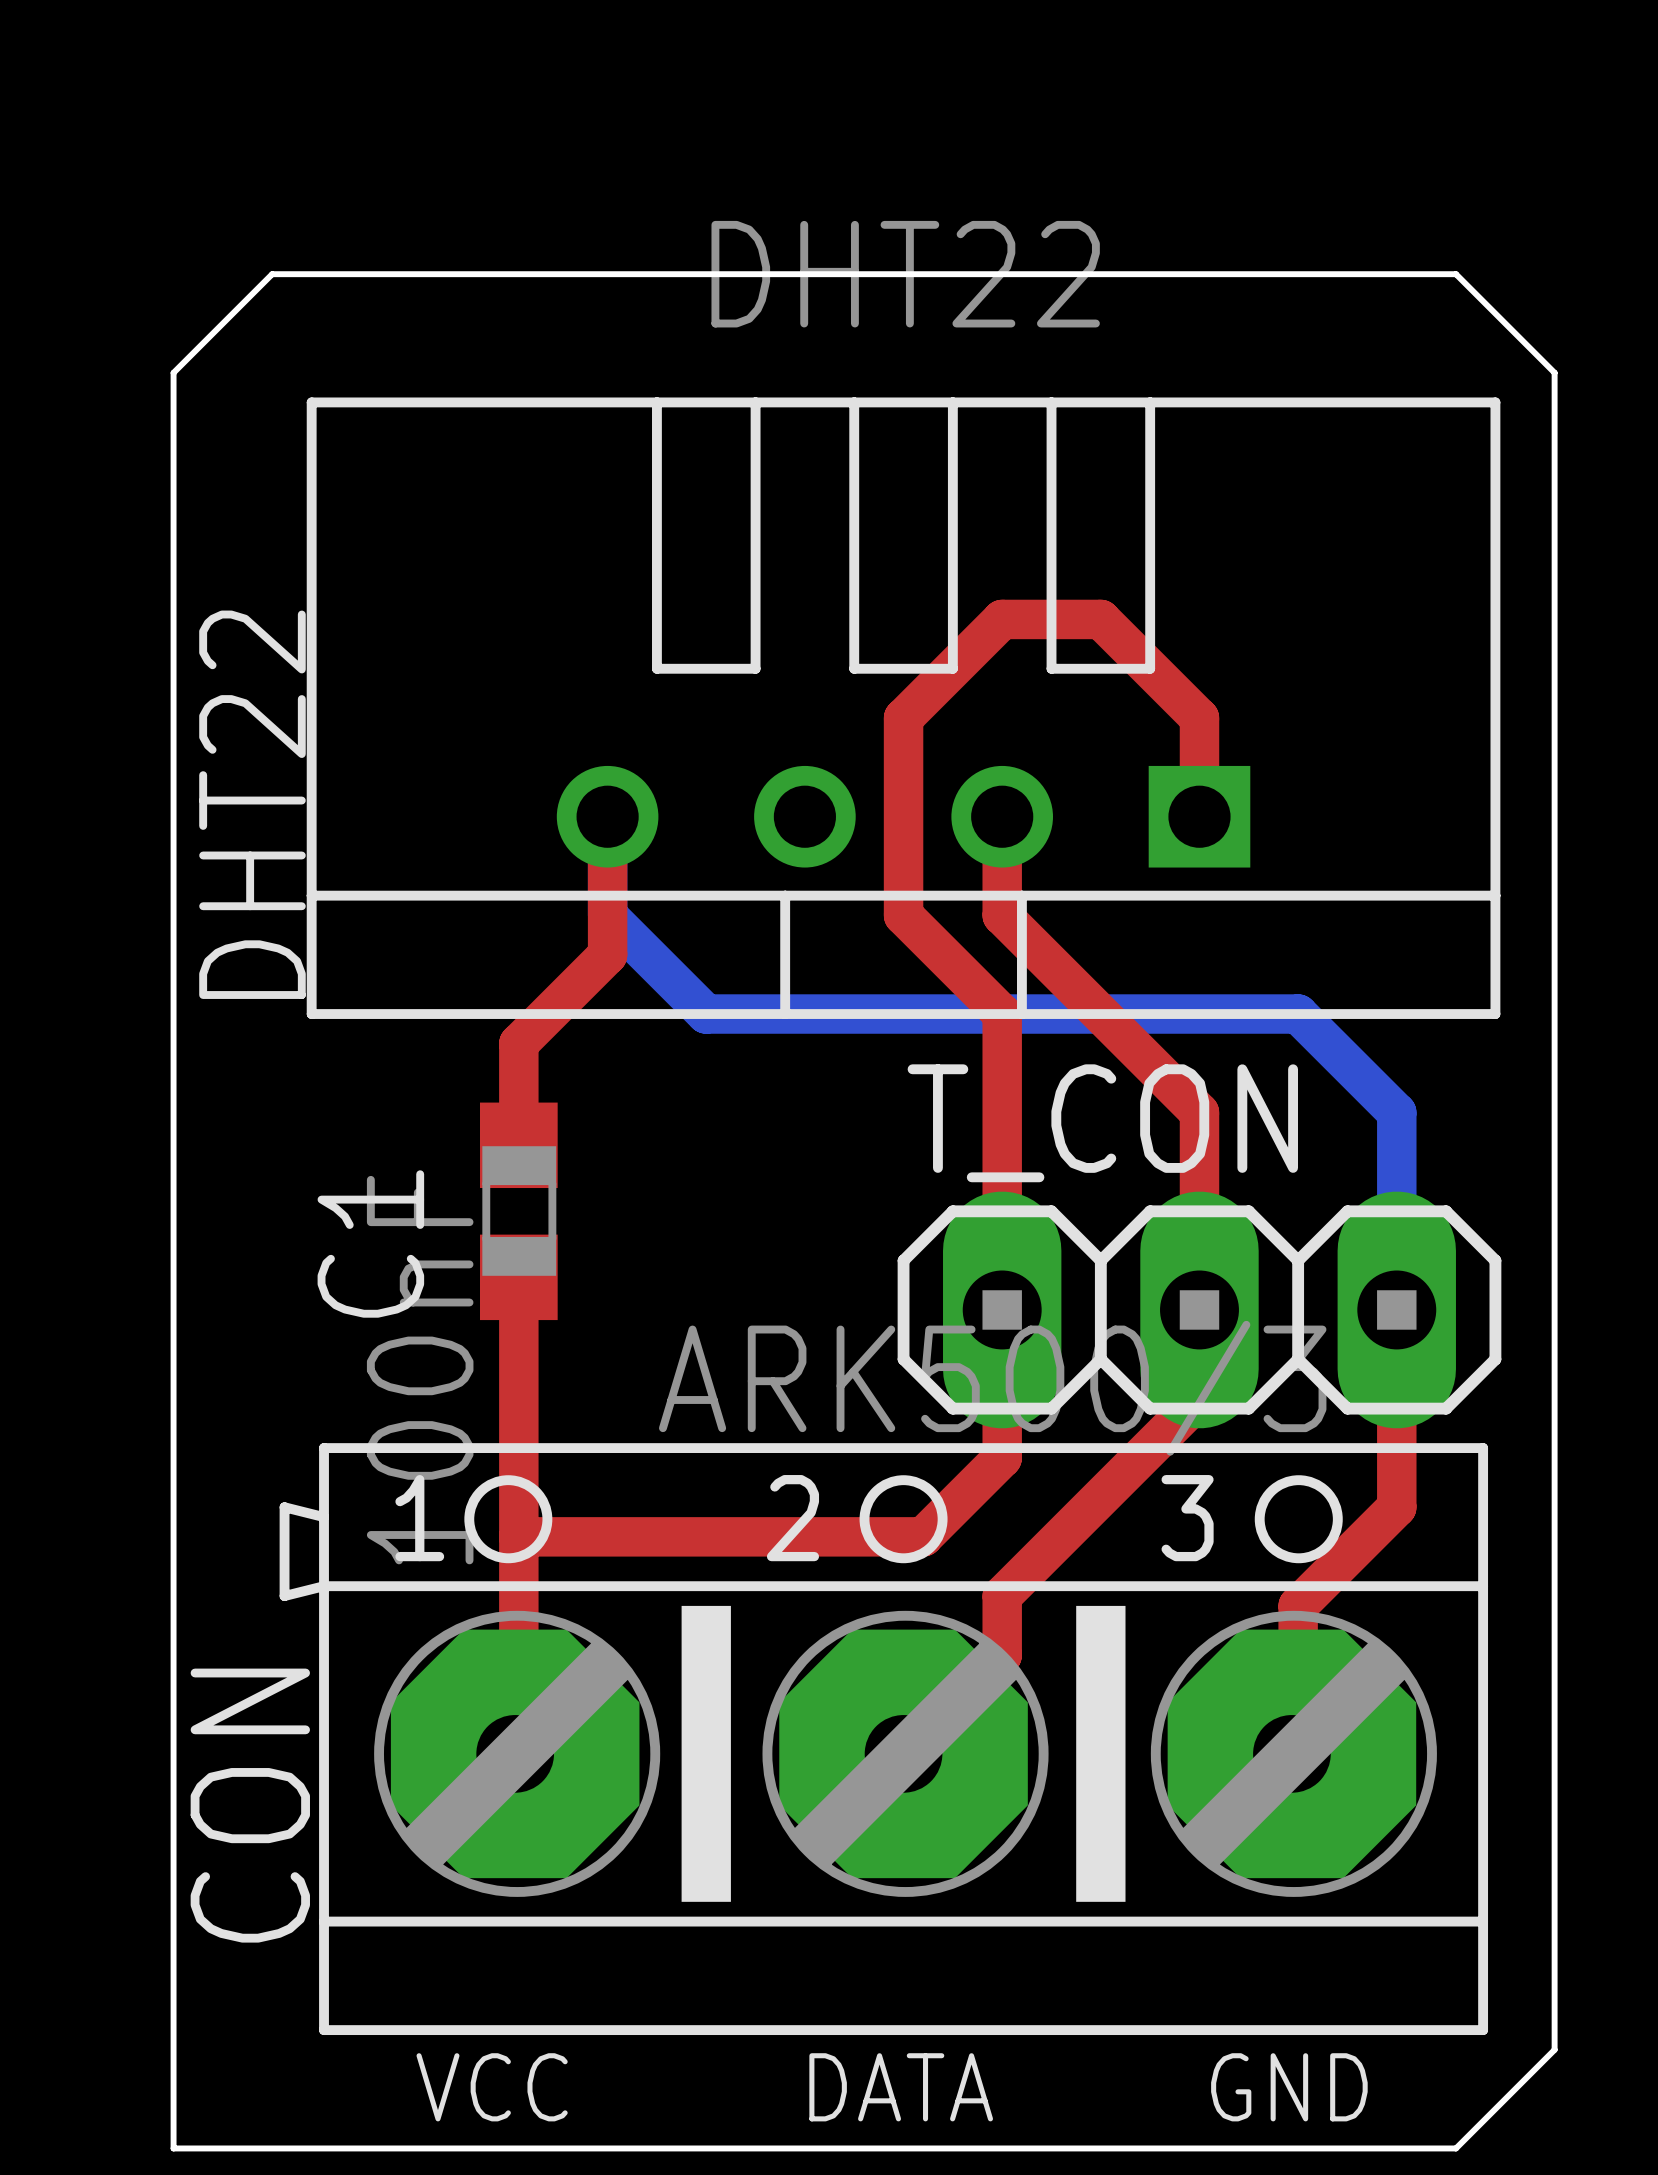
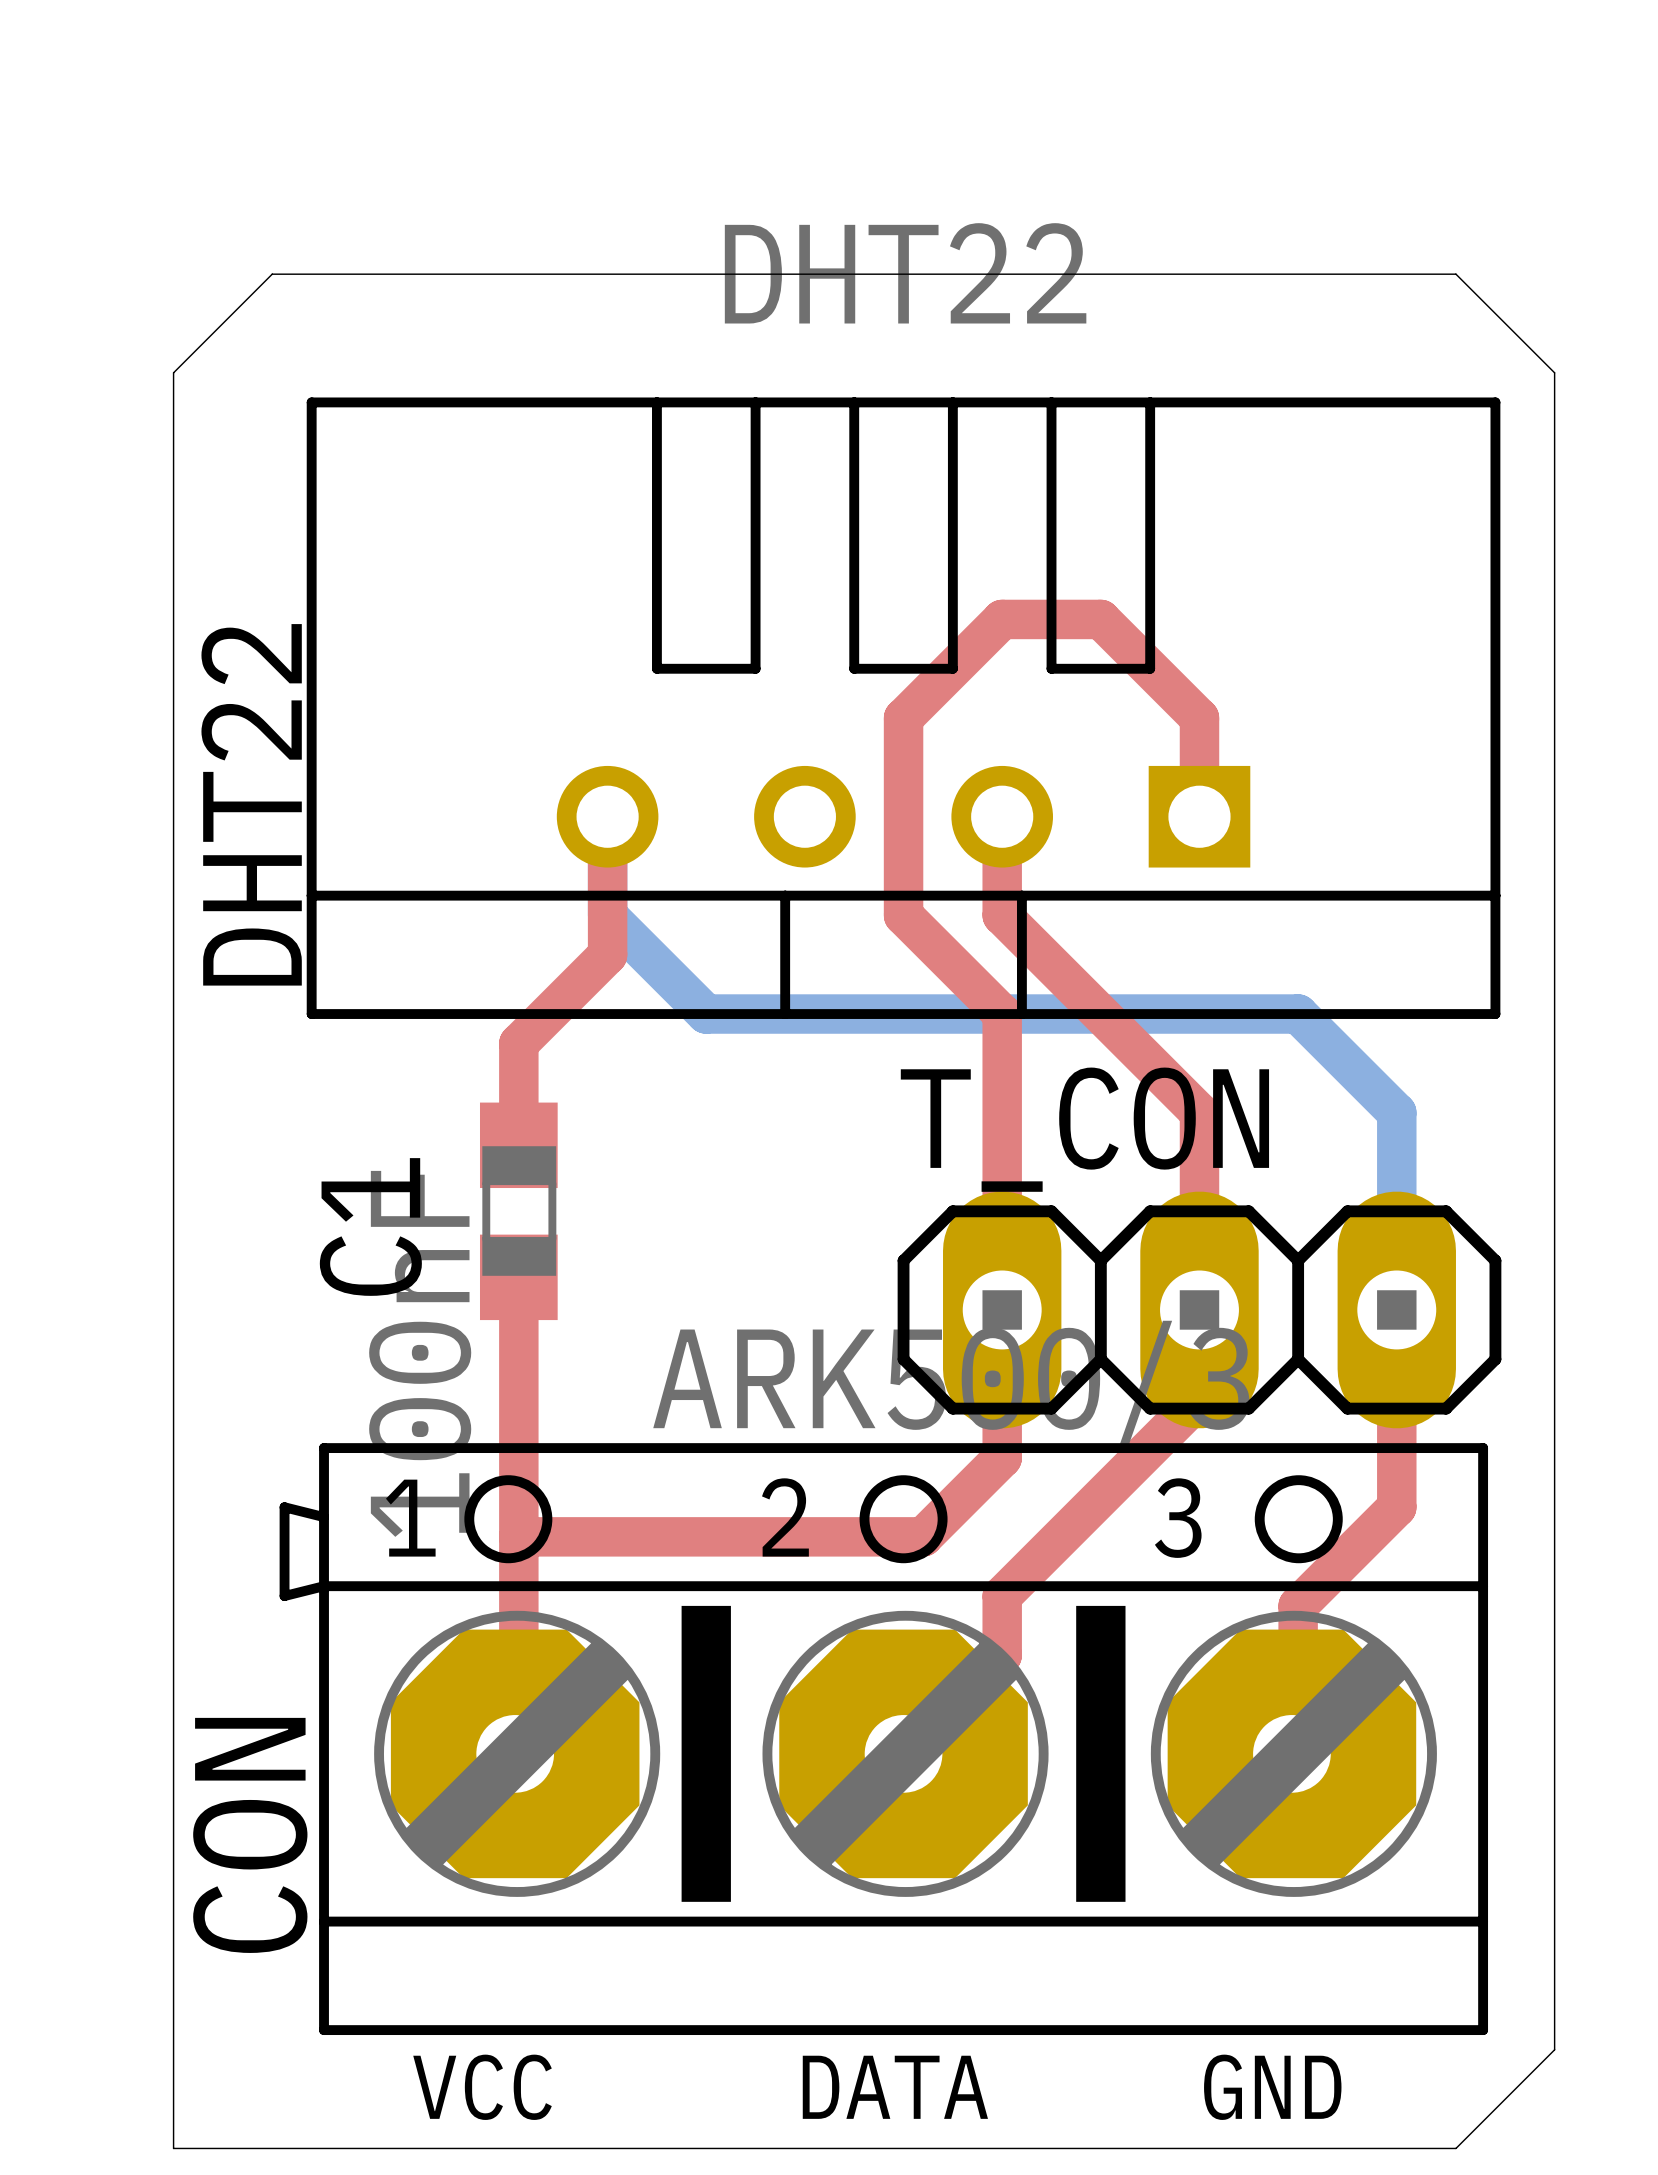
board edge width: thick (272, 274) (1455, 274) (1554, 372) (1554, 2049) (1455, 2148) (173, 2148) (173, 372) (272, 274) -> thin (272, 274) (1455, 274) (1554, 372) (1554, 2049) (1455, 2148) (173, 2148) (173, 372) (272, 274)

